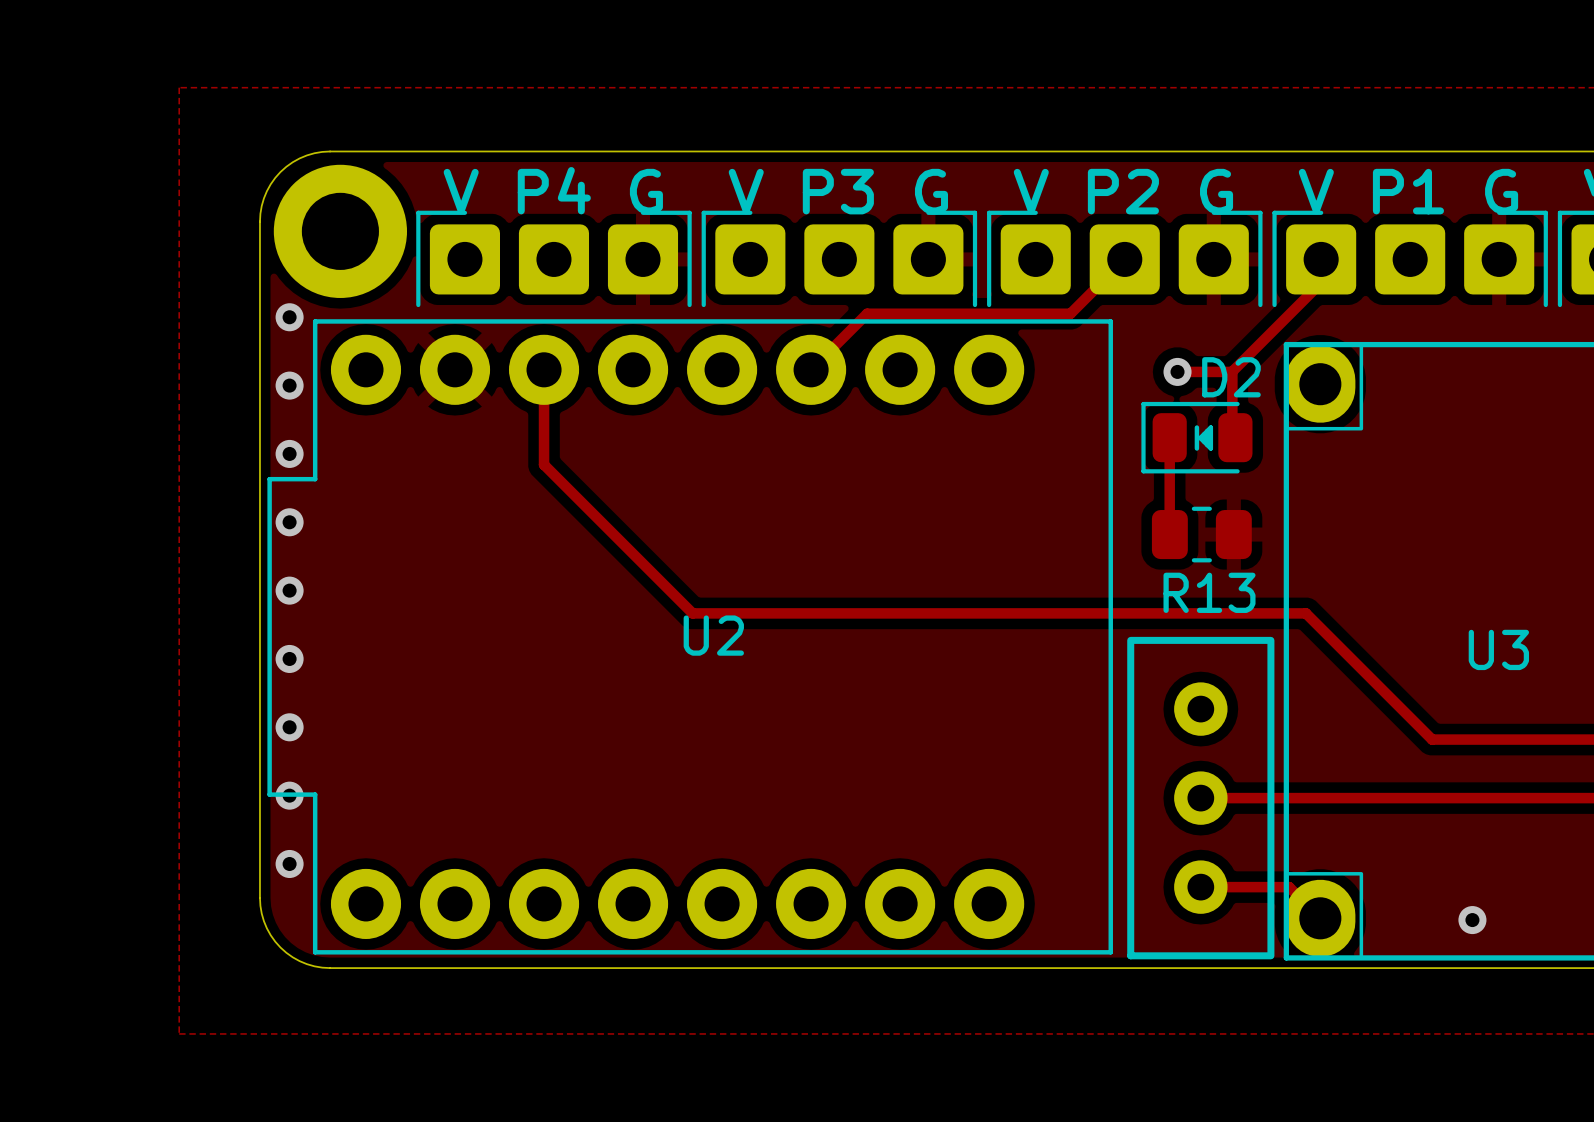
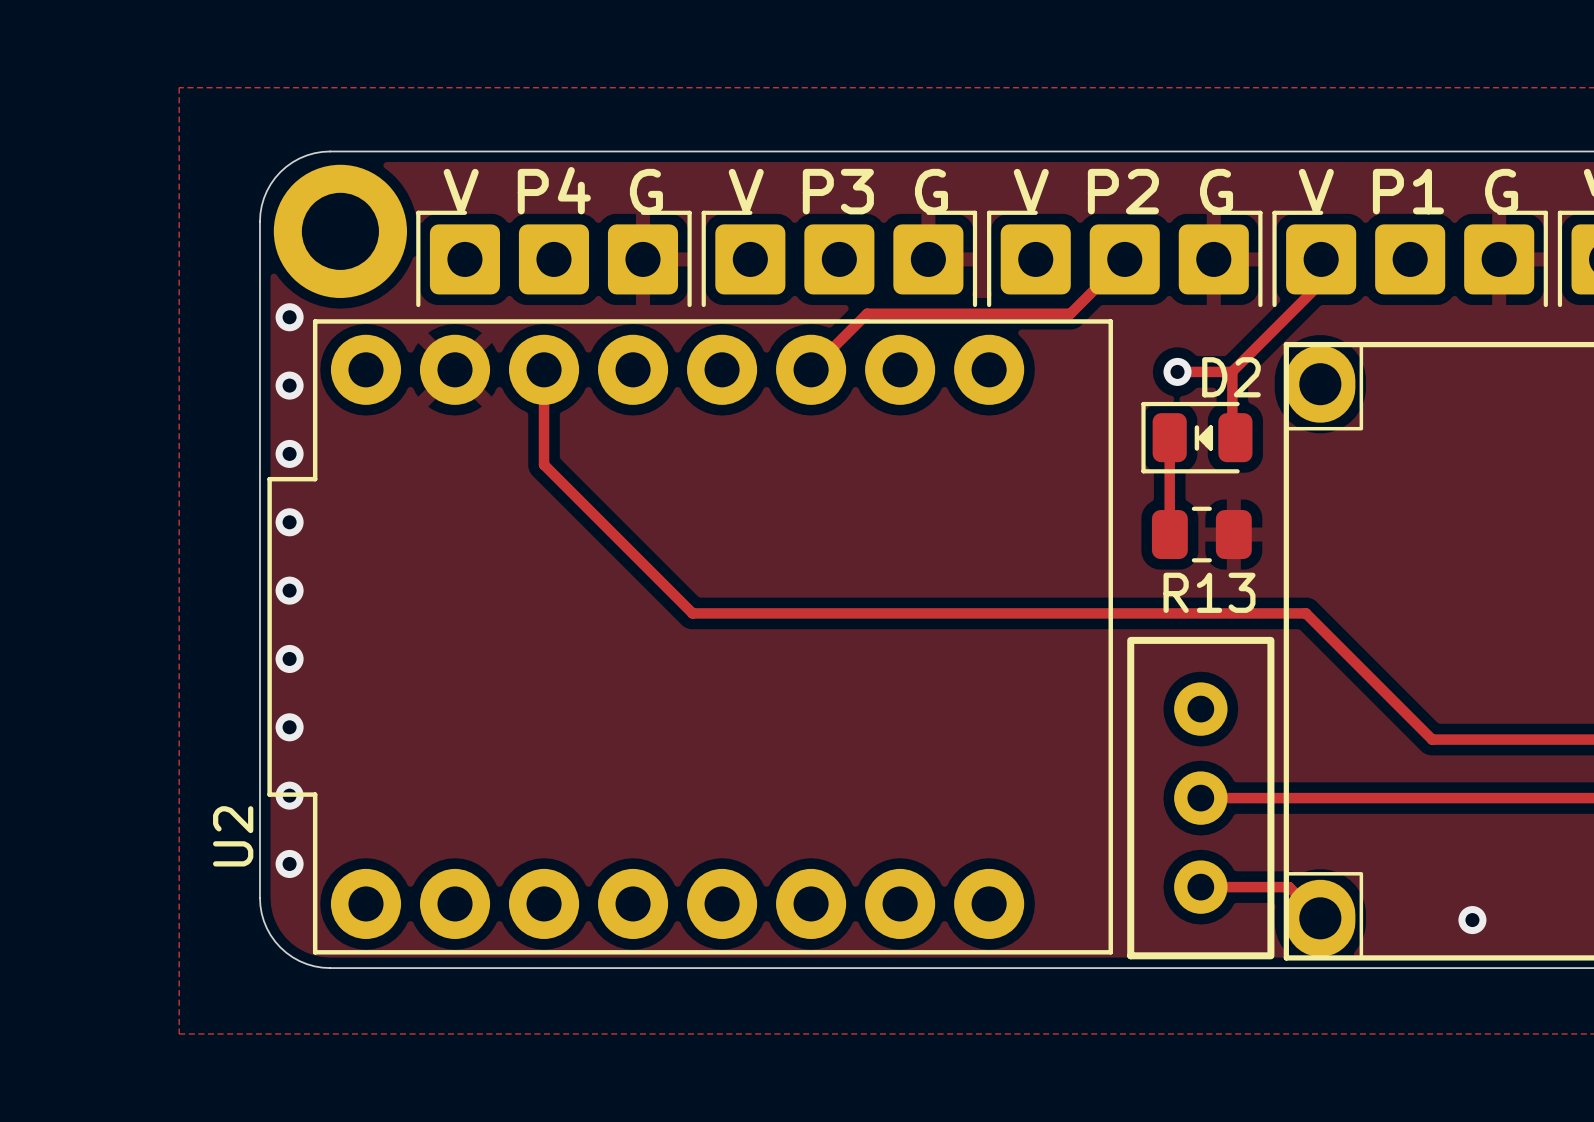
U2 name rotation: 0° (713, 635) -> 90° counterclockwise (233, 836)
U2 name position: U2 (713, 635) -> U2 (233, 836)
U3 name: U3 (1498, 649) -> none

